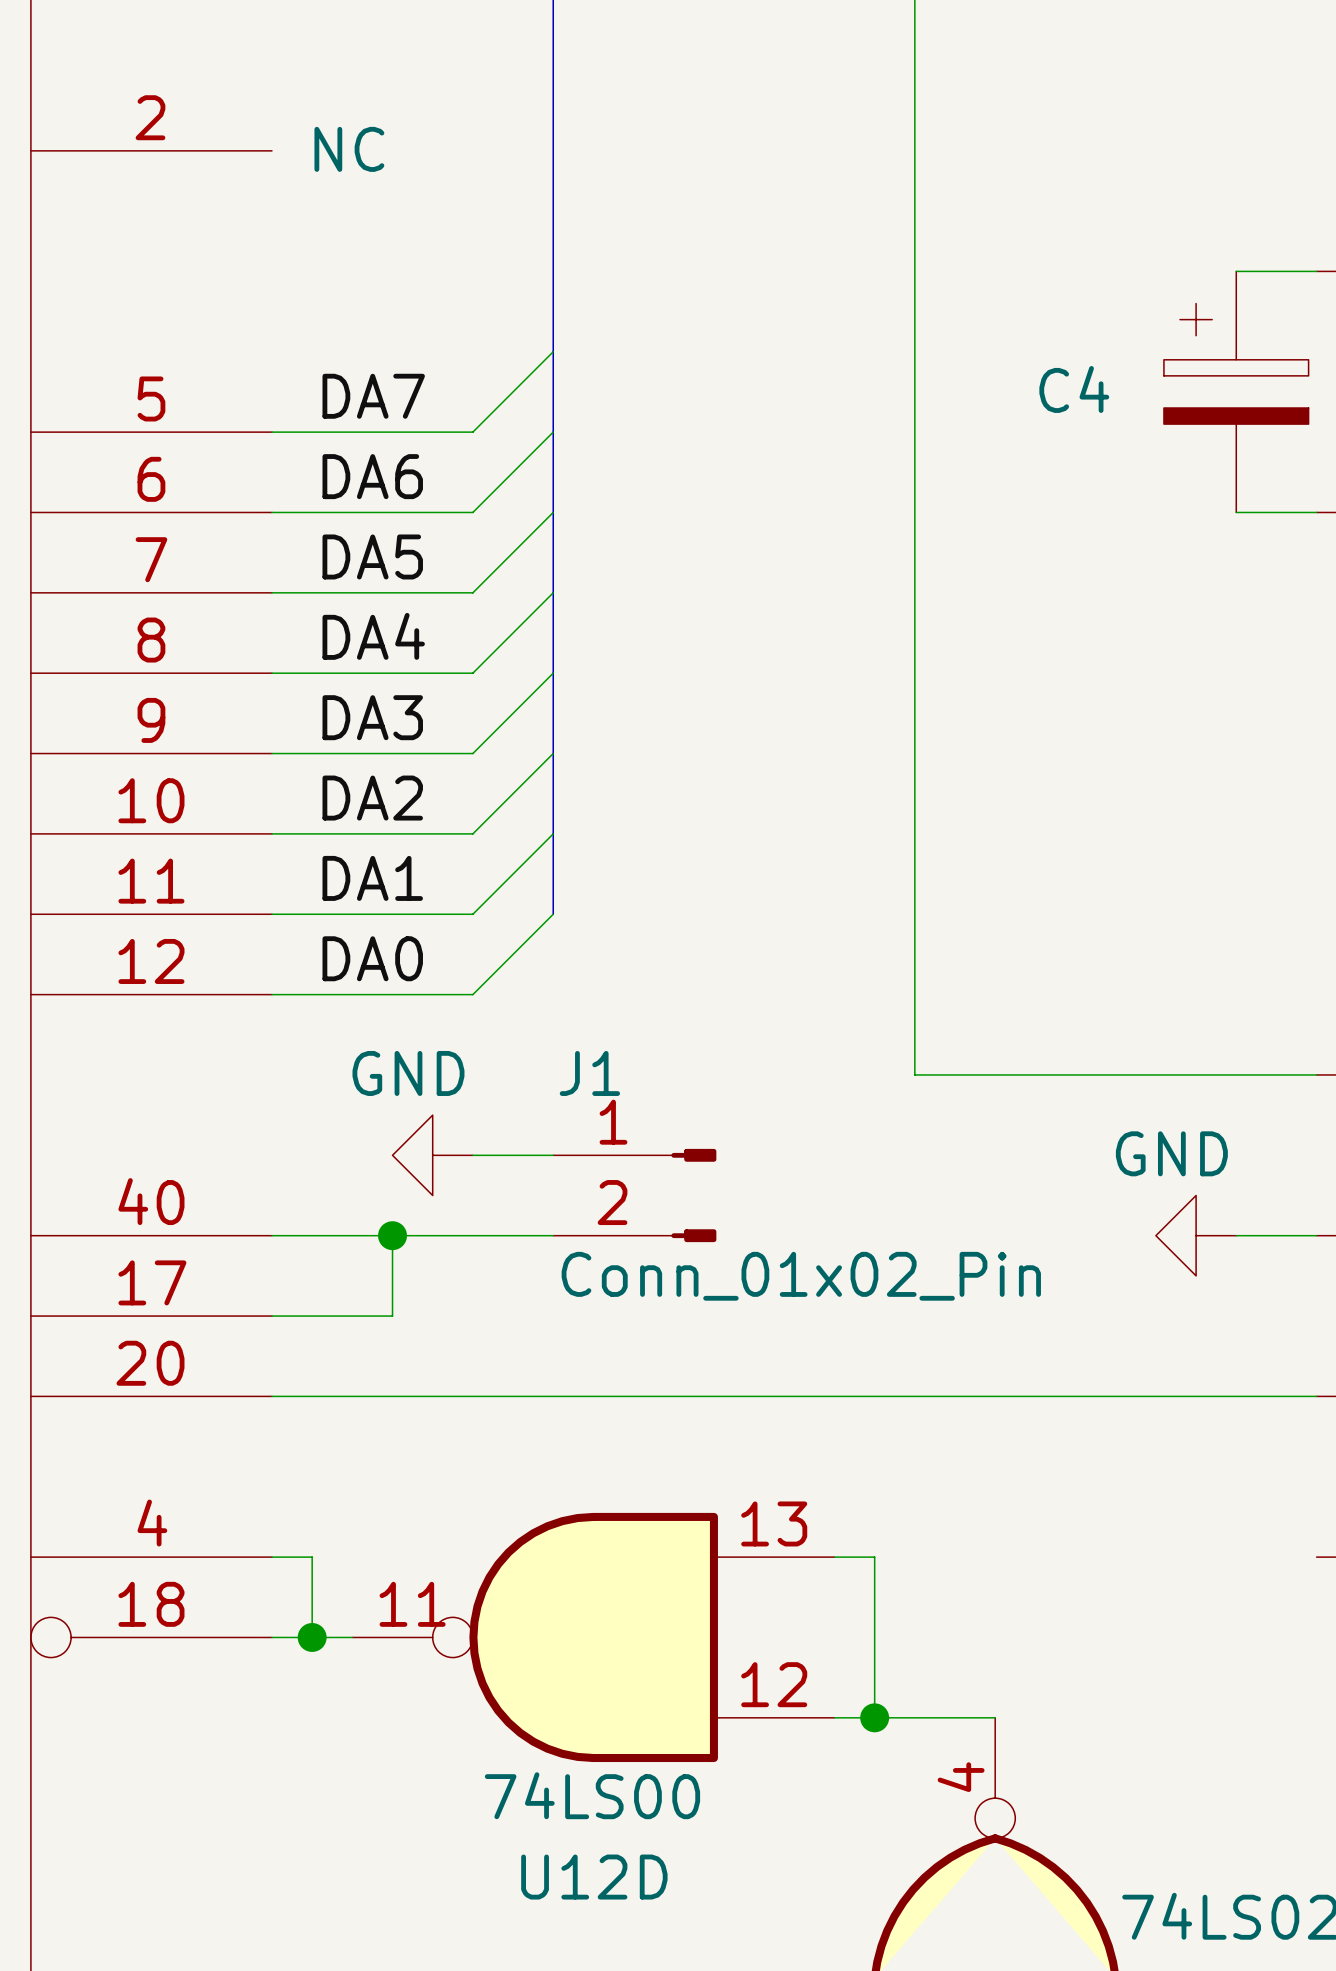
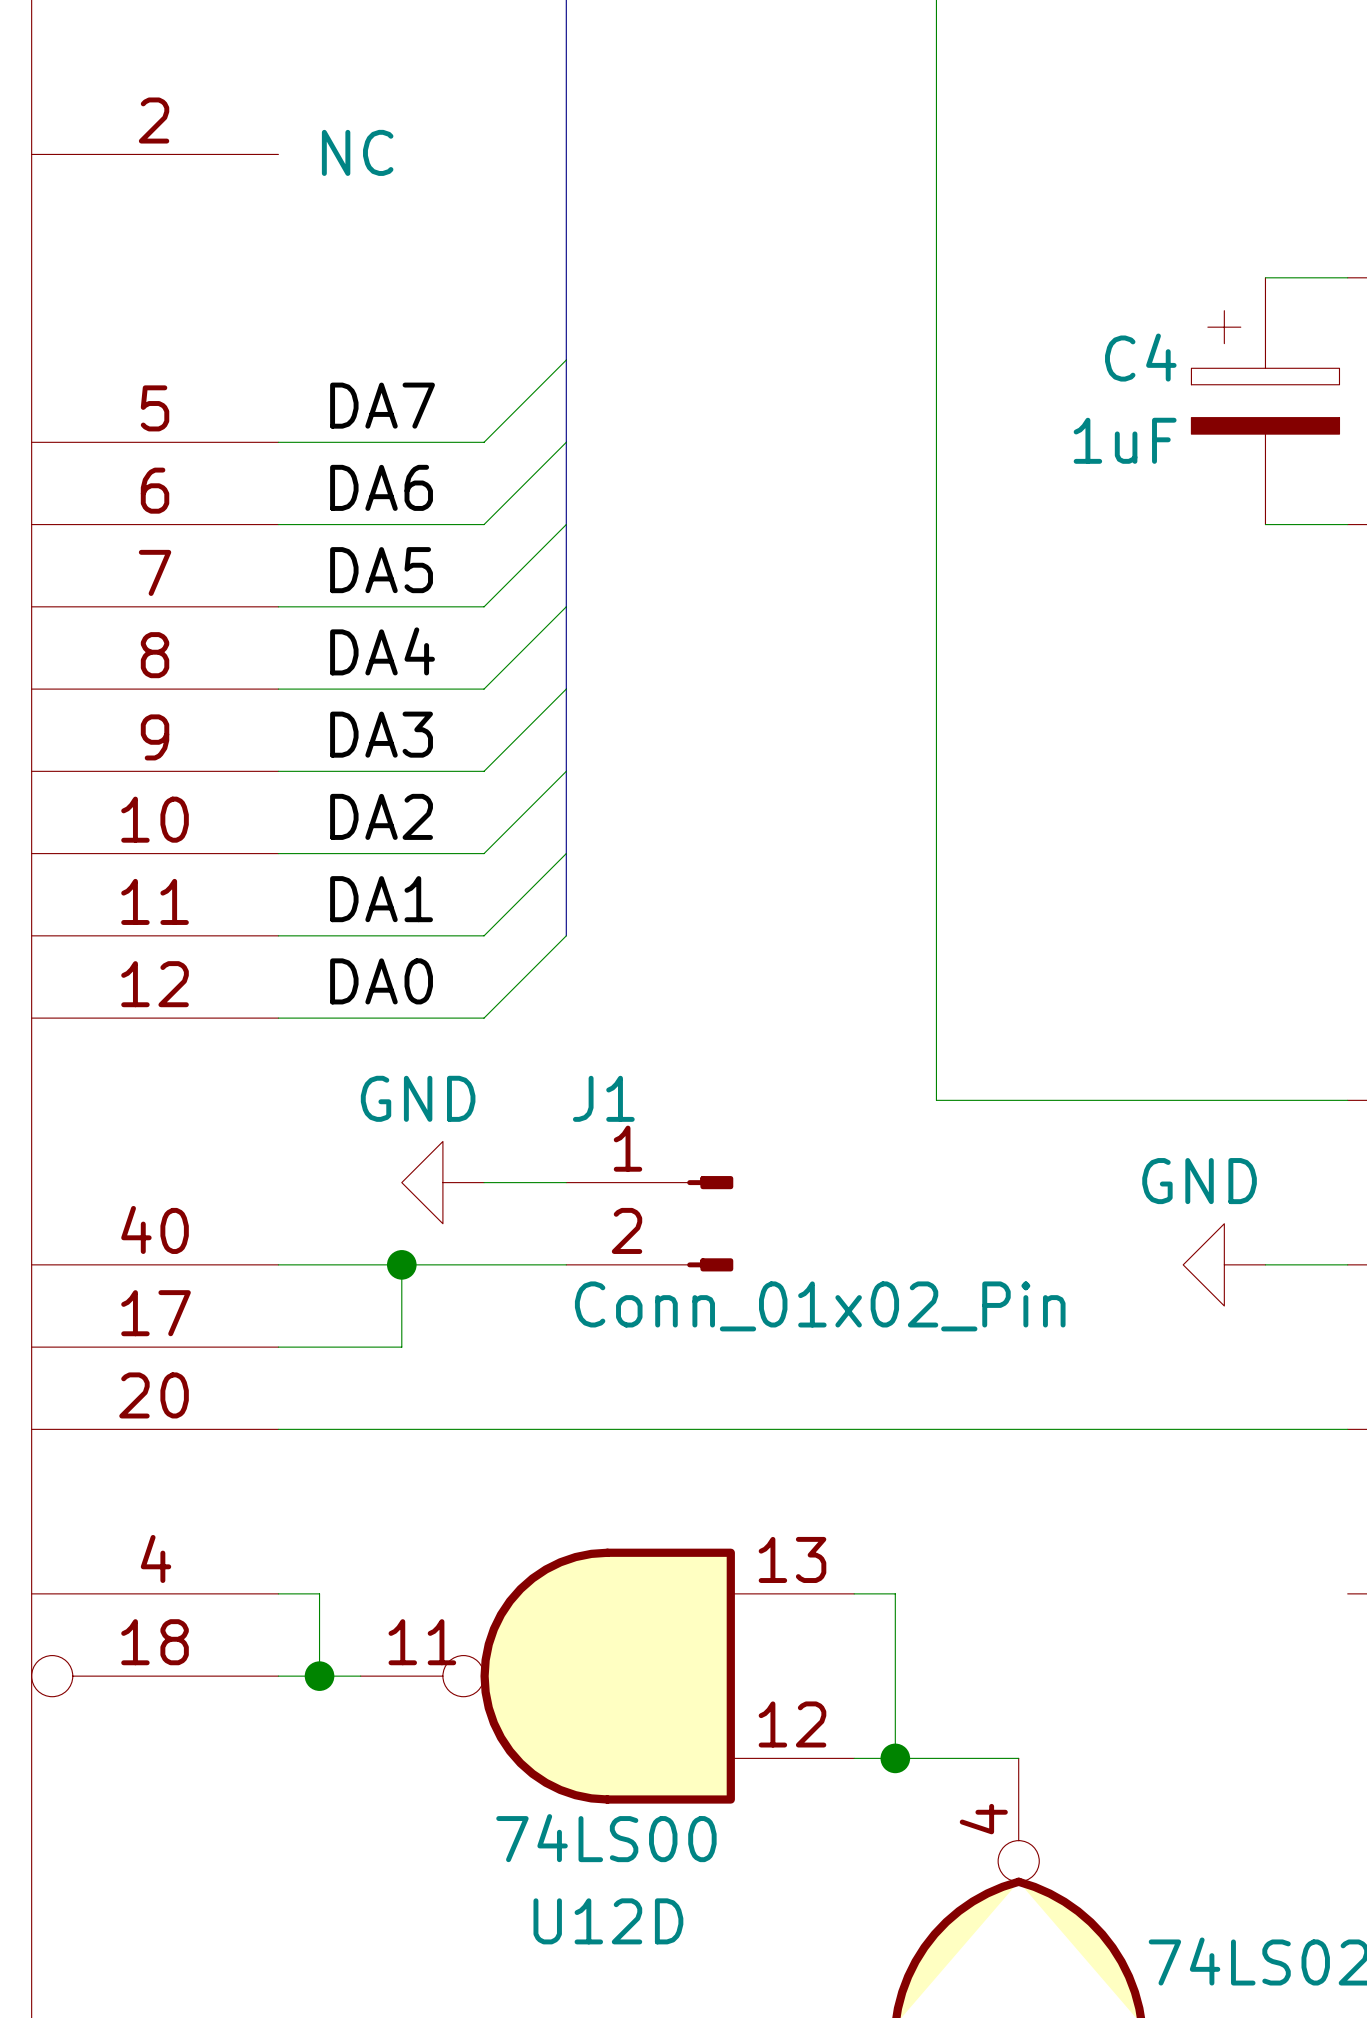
C4 name position: C4 (1074, 389) -> C4 (1140, 357)
C4 value: none -> 1uF (1125, 440)

